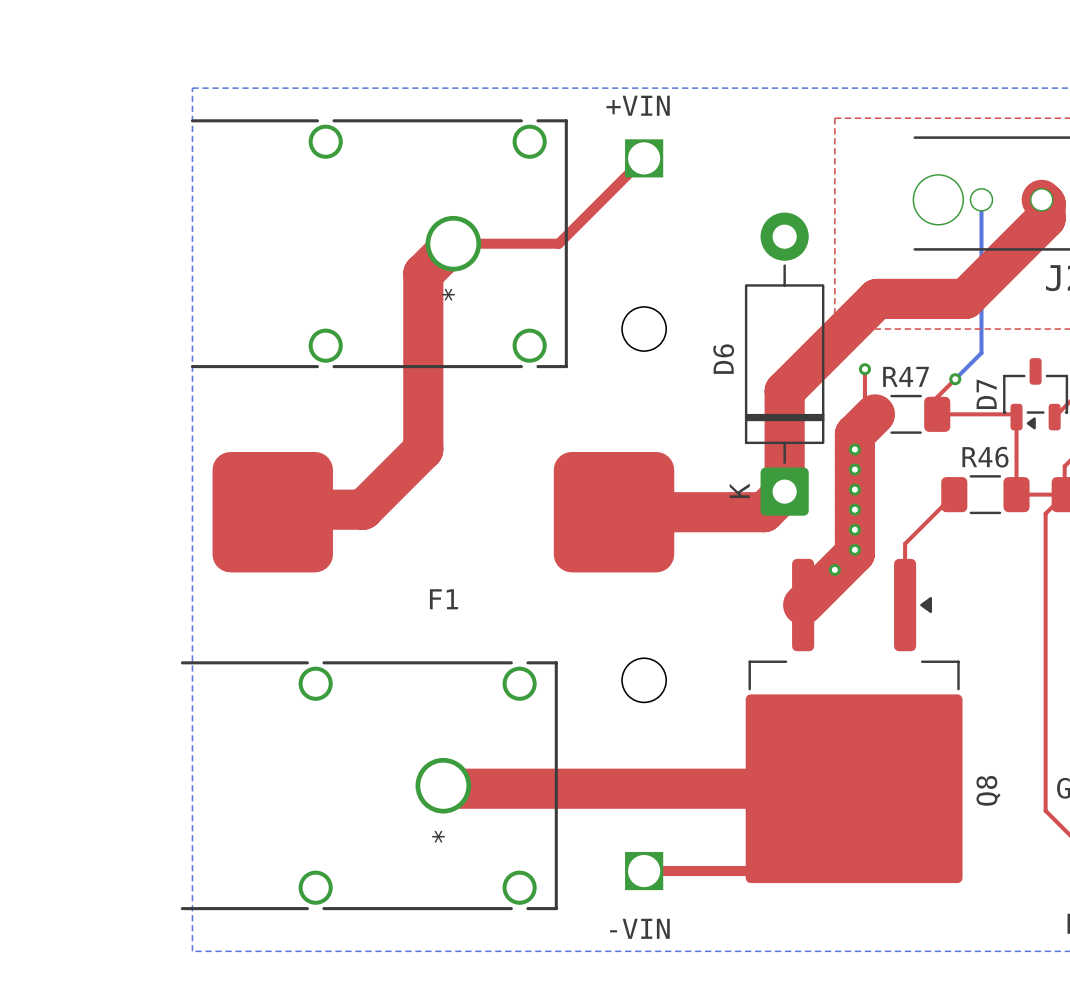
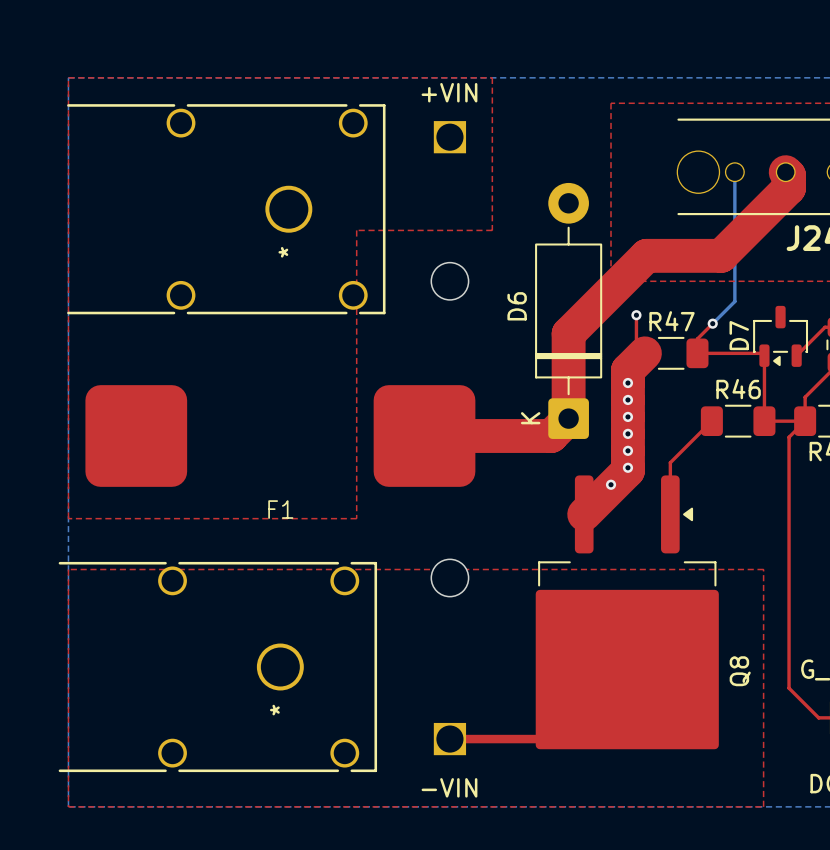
top zone outline: none -> (68, 77) (492, 77) (492, 230) (356, 230) (356, 518) (68, 518) (68, 77)
top track: (644, 158) (558, 243) (453, 243) (423, 273) (423, 449) (363, 509) (275, 509) -> none
top zone outline: none -> (68, 569) (68, 806) (763, 806) (763, 569) (68, 569)
top track: (446, 788) (854, 788) -> none

